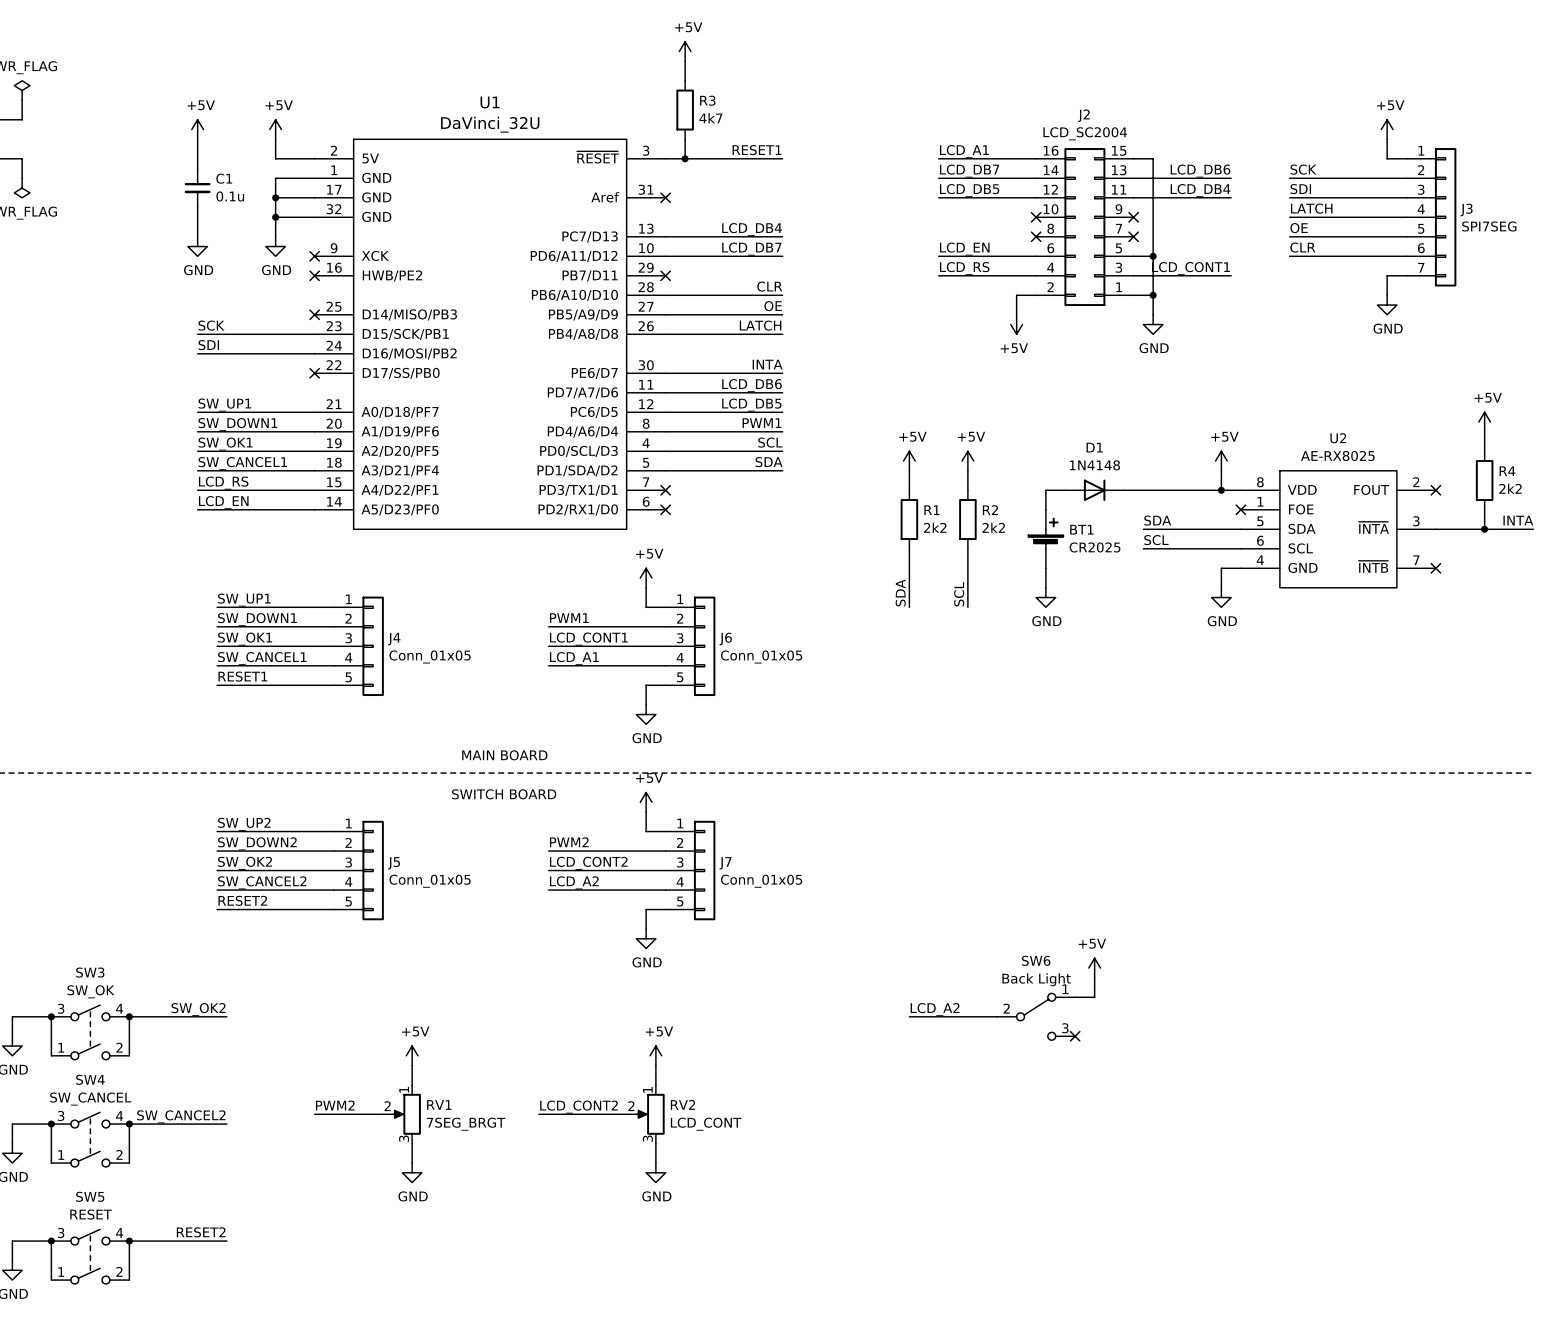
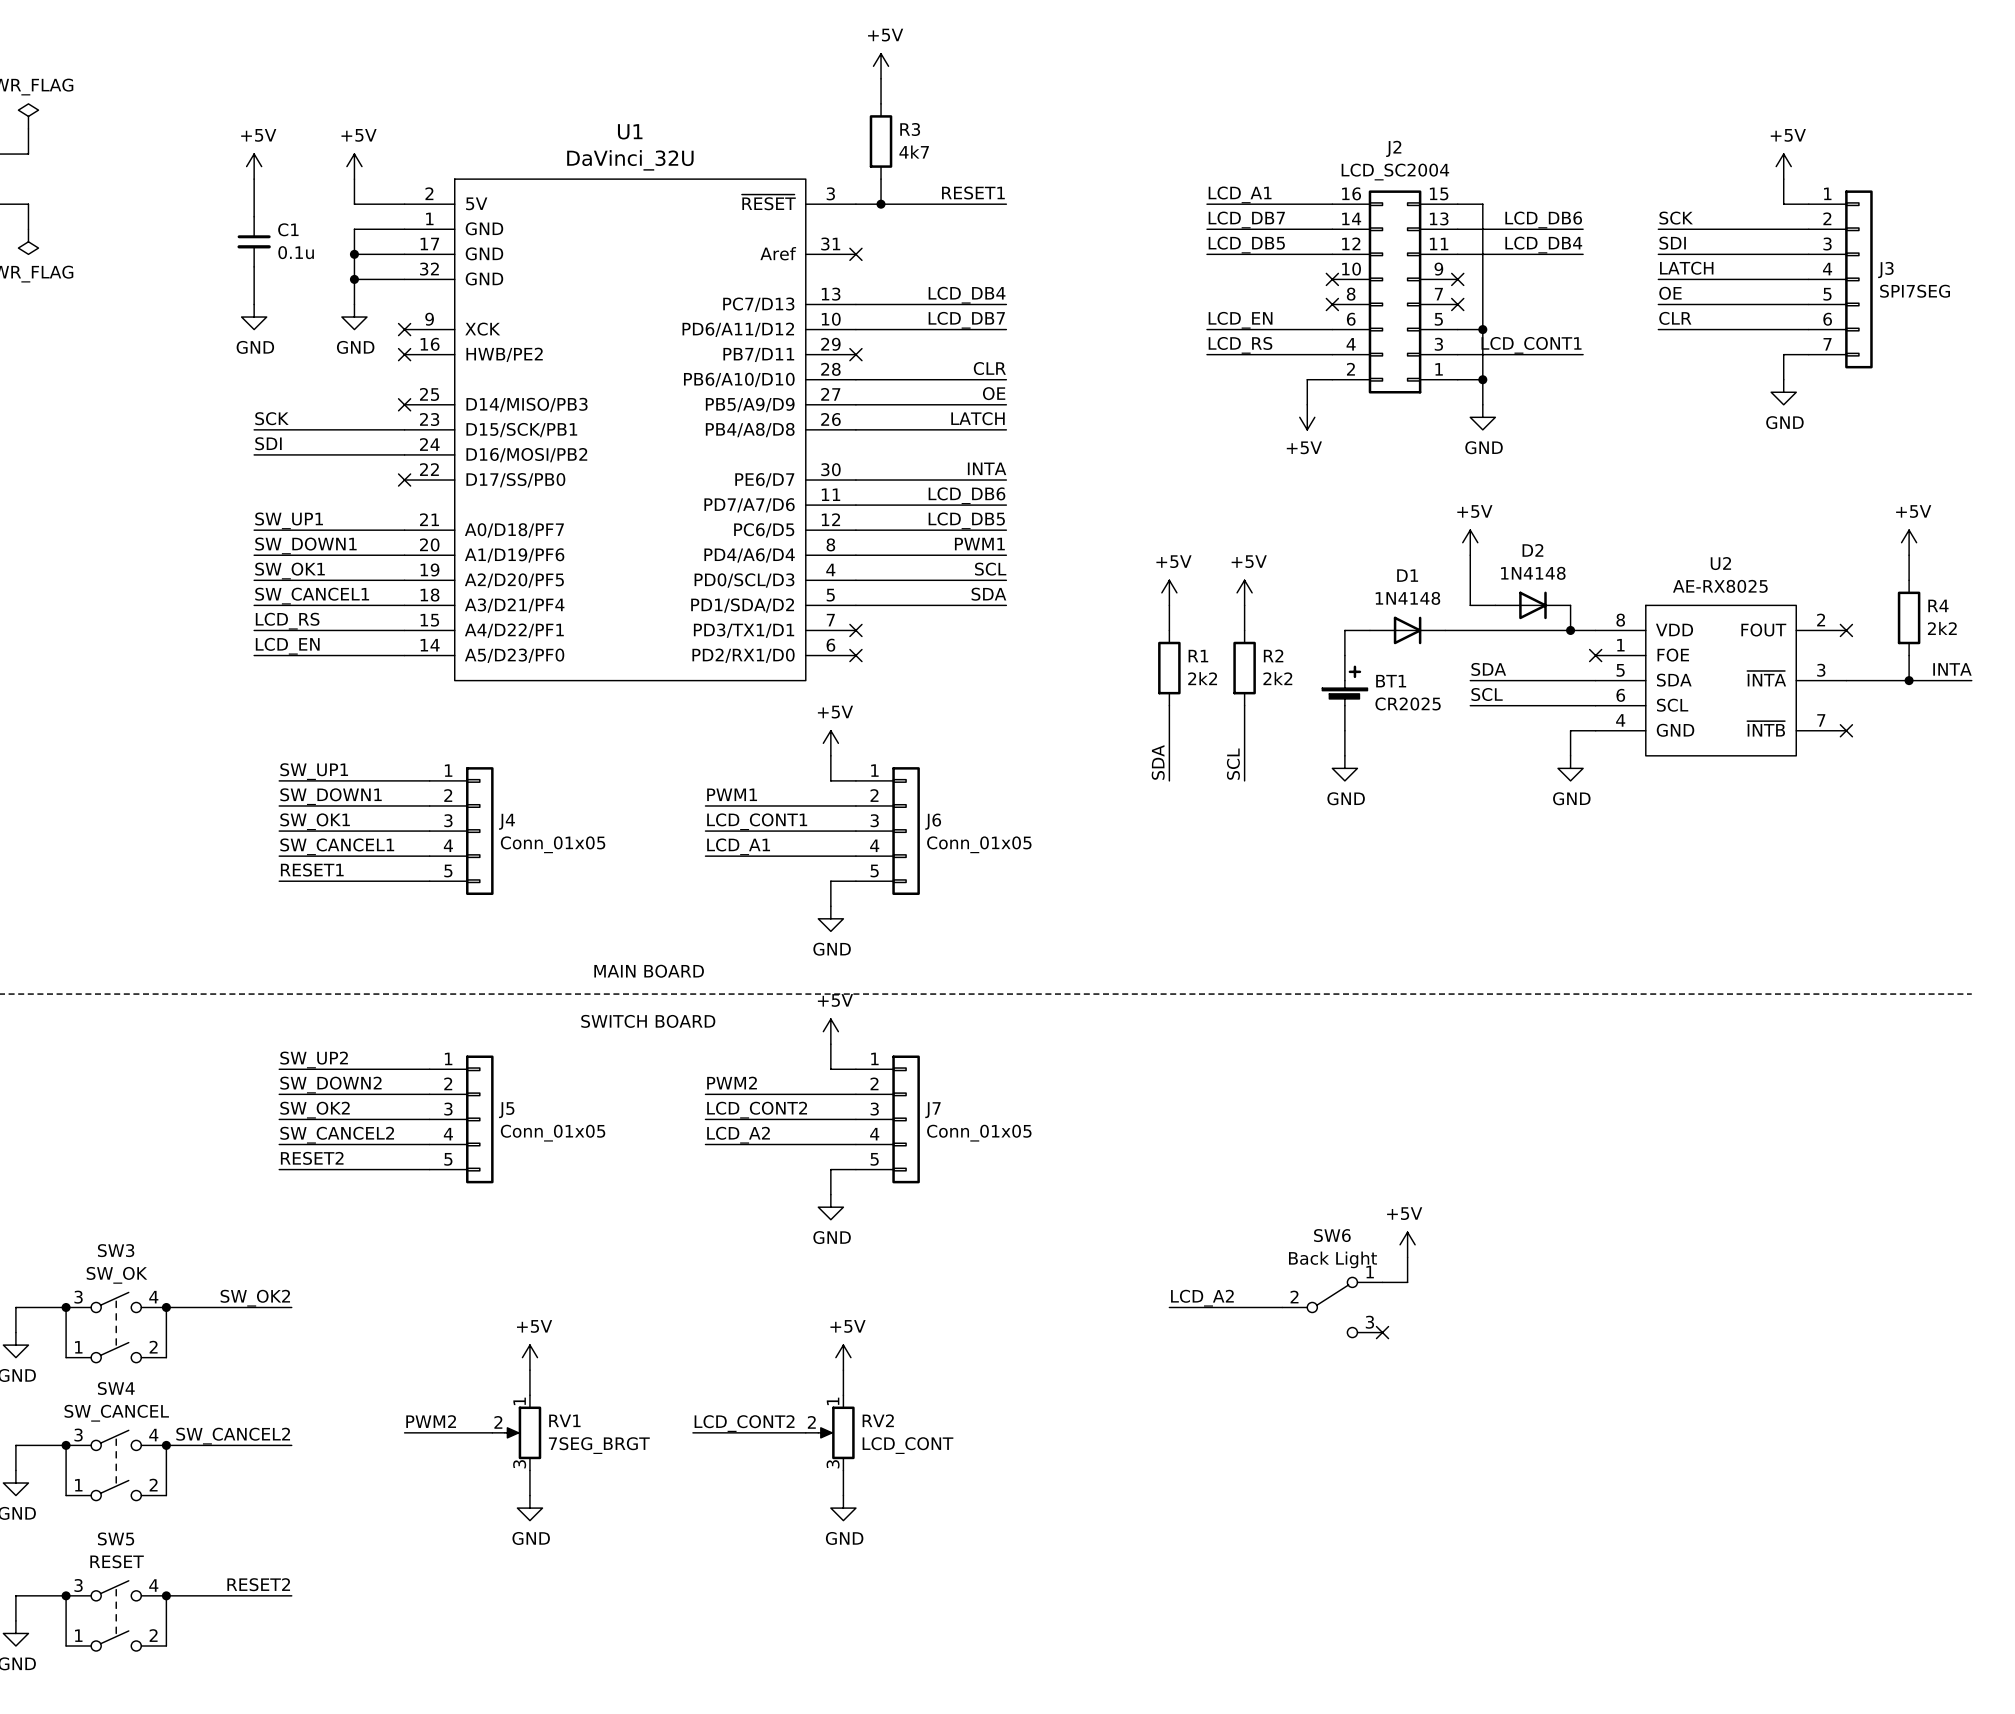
wire: none -> (1470, 555) (1470, 605) (1495, 605)
power symbol position: +5V (1221, 461) -> +5V (1470, 542)
D2: none -> 1N4148 (1532, 605)

